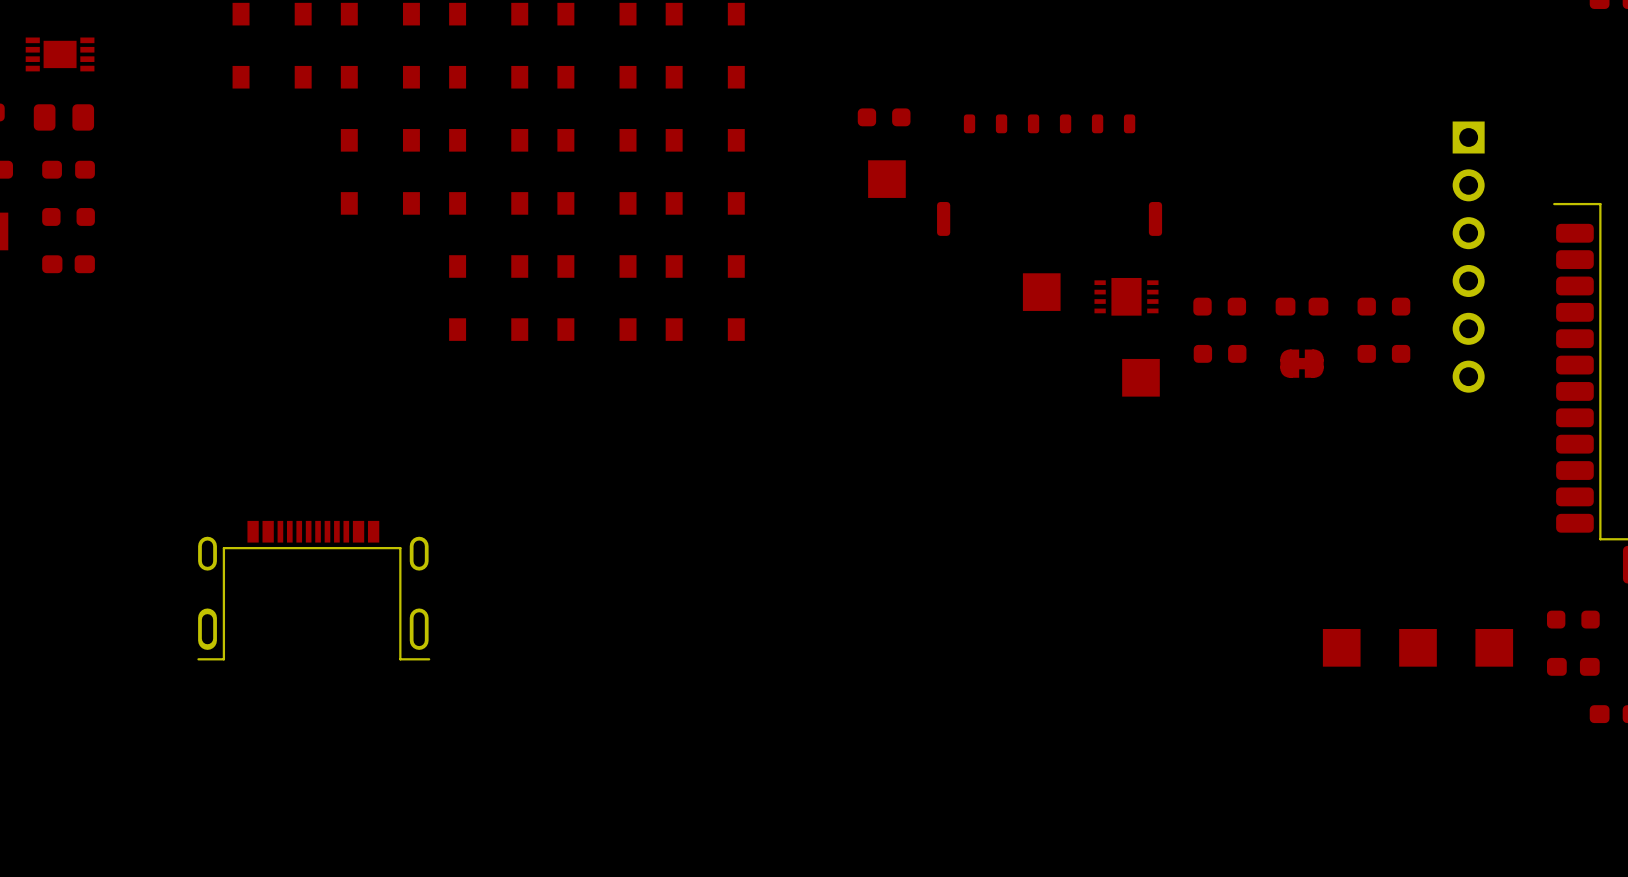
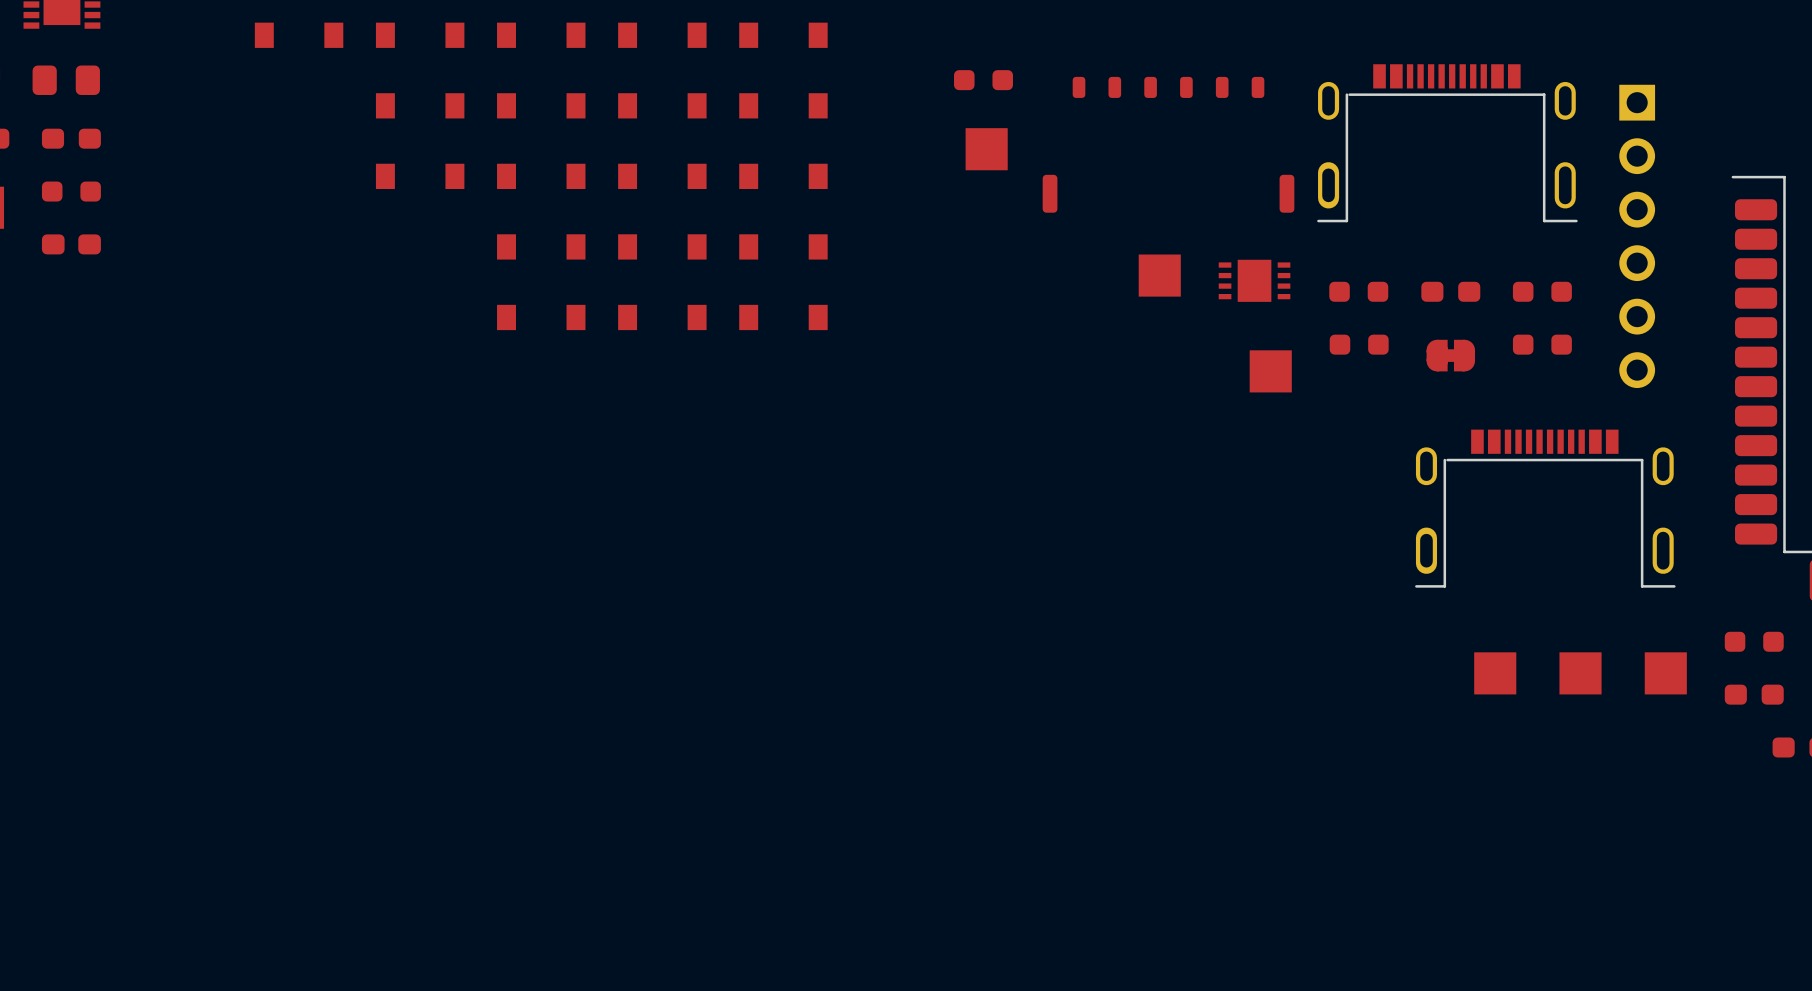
part: none -> (1447, 143)
part: none -> (1545, 508)
part: (313, 590) -> none

